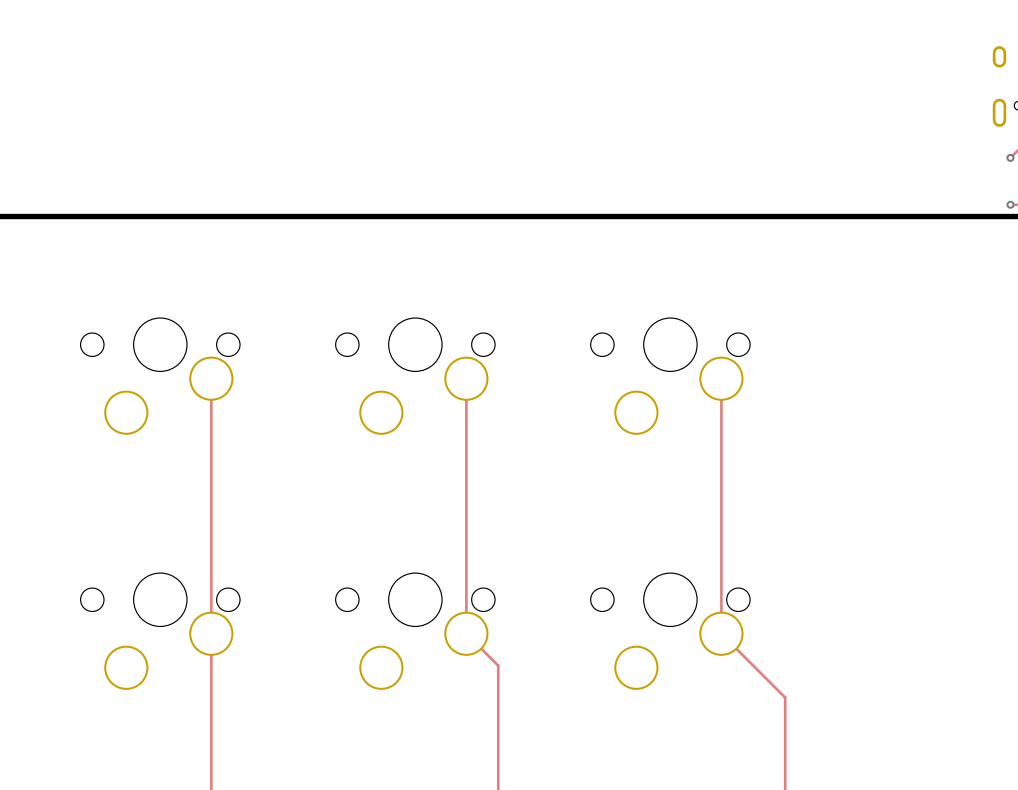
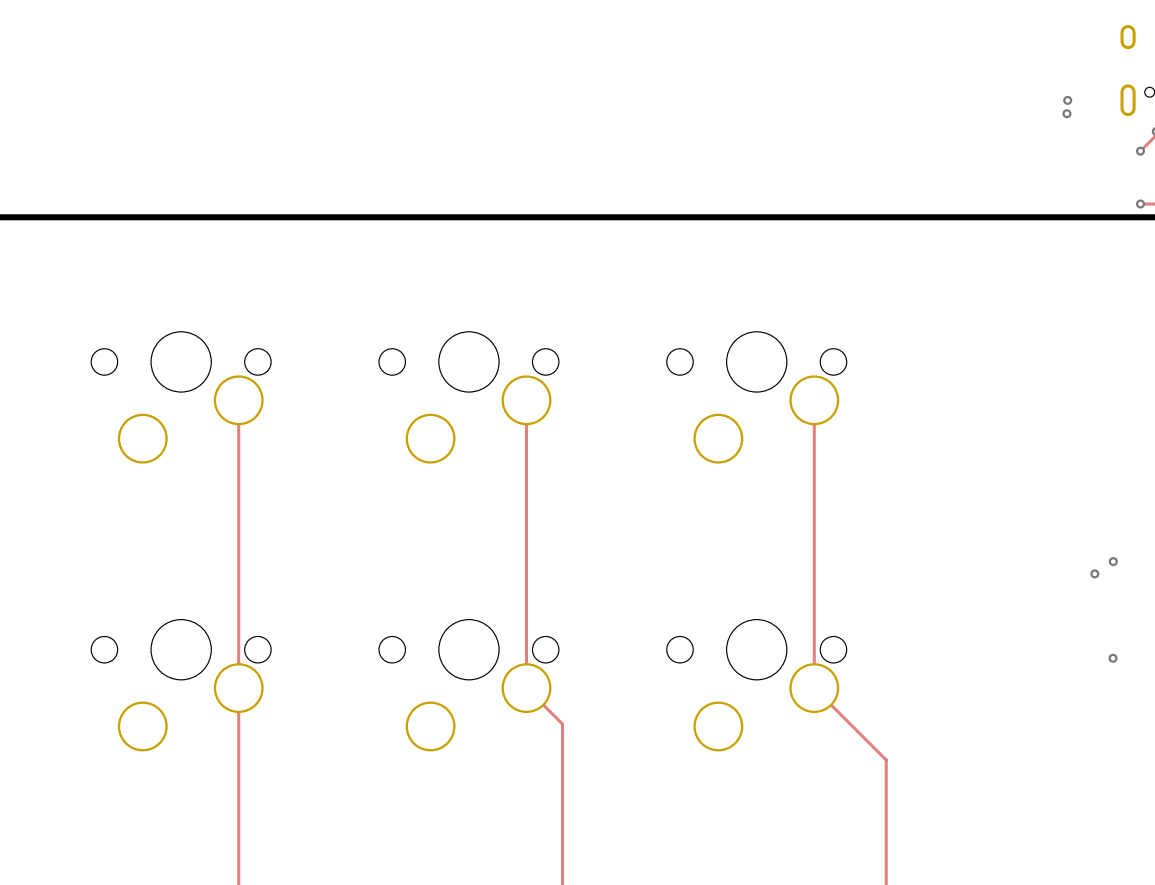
via: none -> (1067, 100)
via: none -> (1066, 113)
via: none -> (1113, 561)
via: none -> (1094, 573)
via: none -> (1113, 658)

